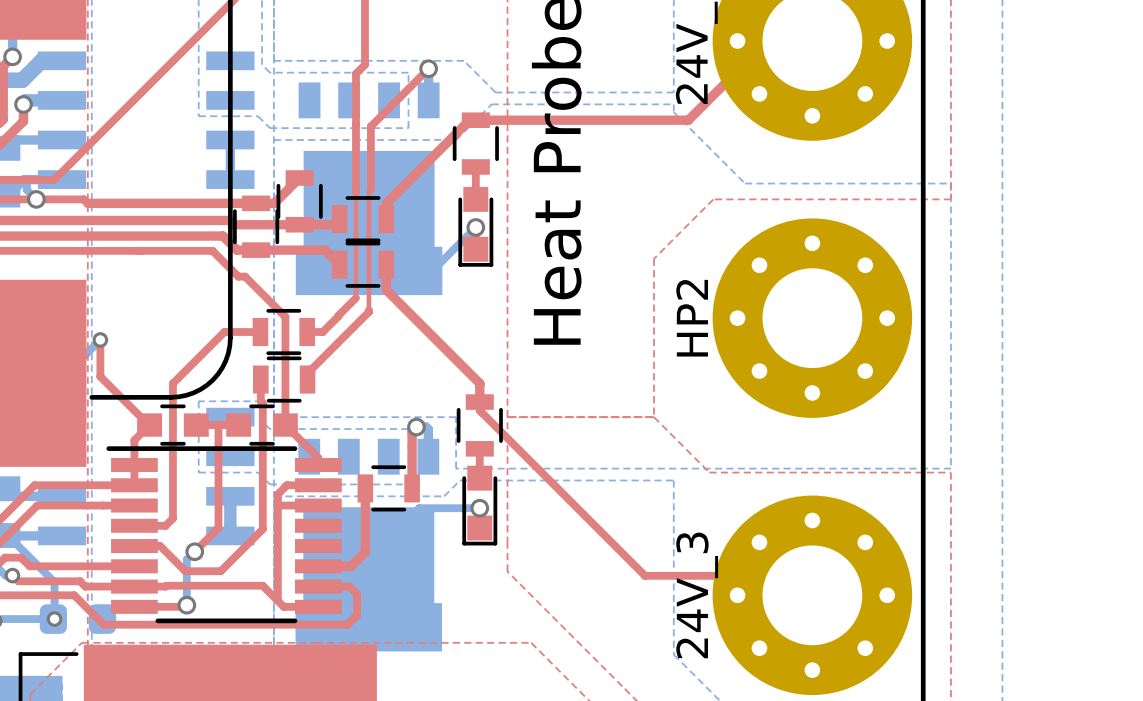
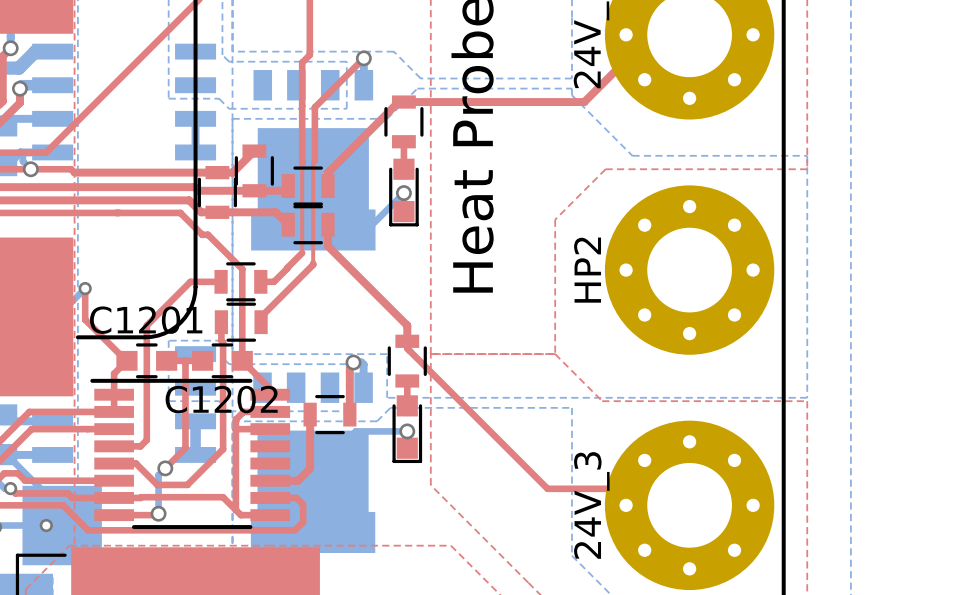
C1201 name: none -> C1201 (146, 320)
C1202 name: none -> C1202 (221, 399)
part footprint: [39, 604, 117, 634] -> [22, 485, 102, 566]

